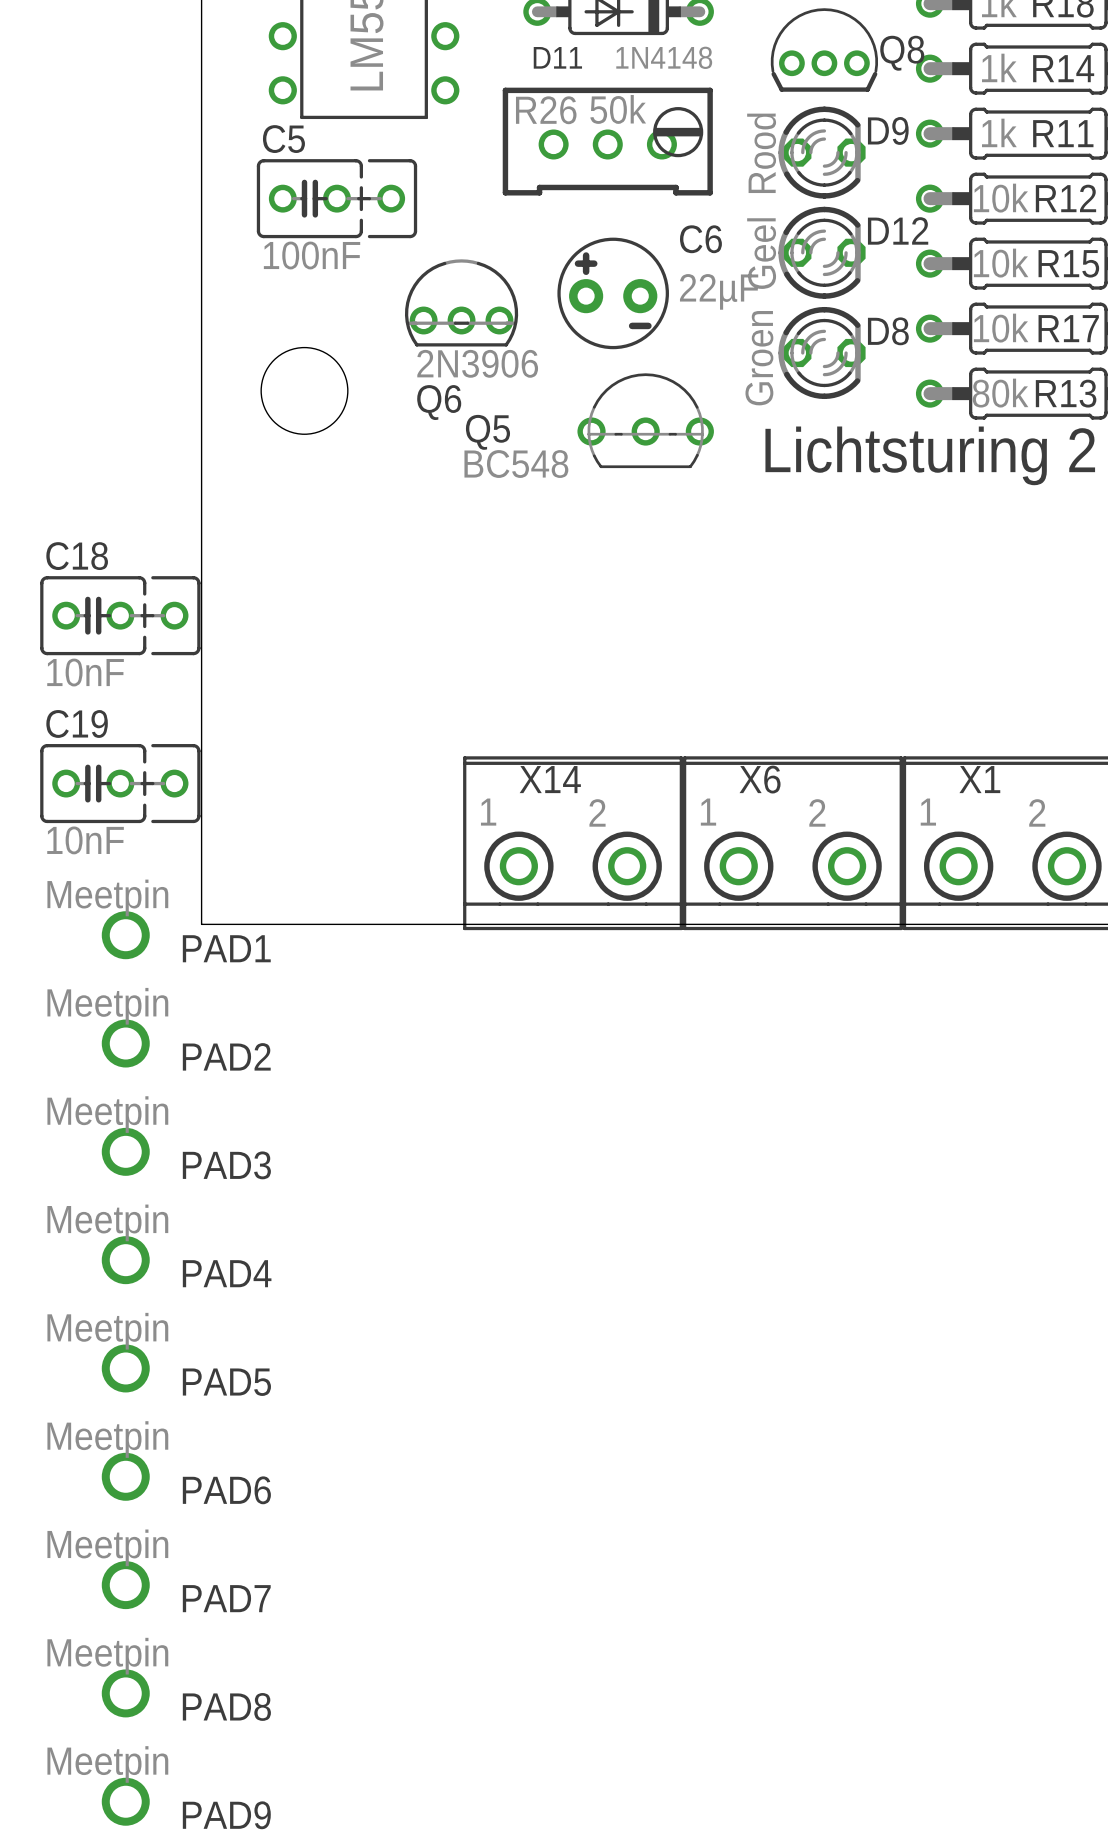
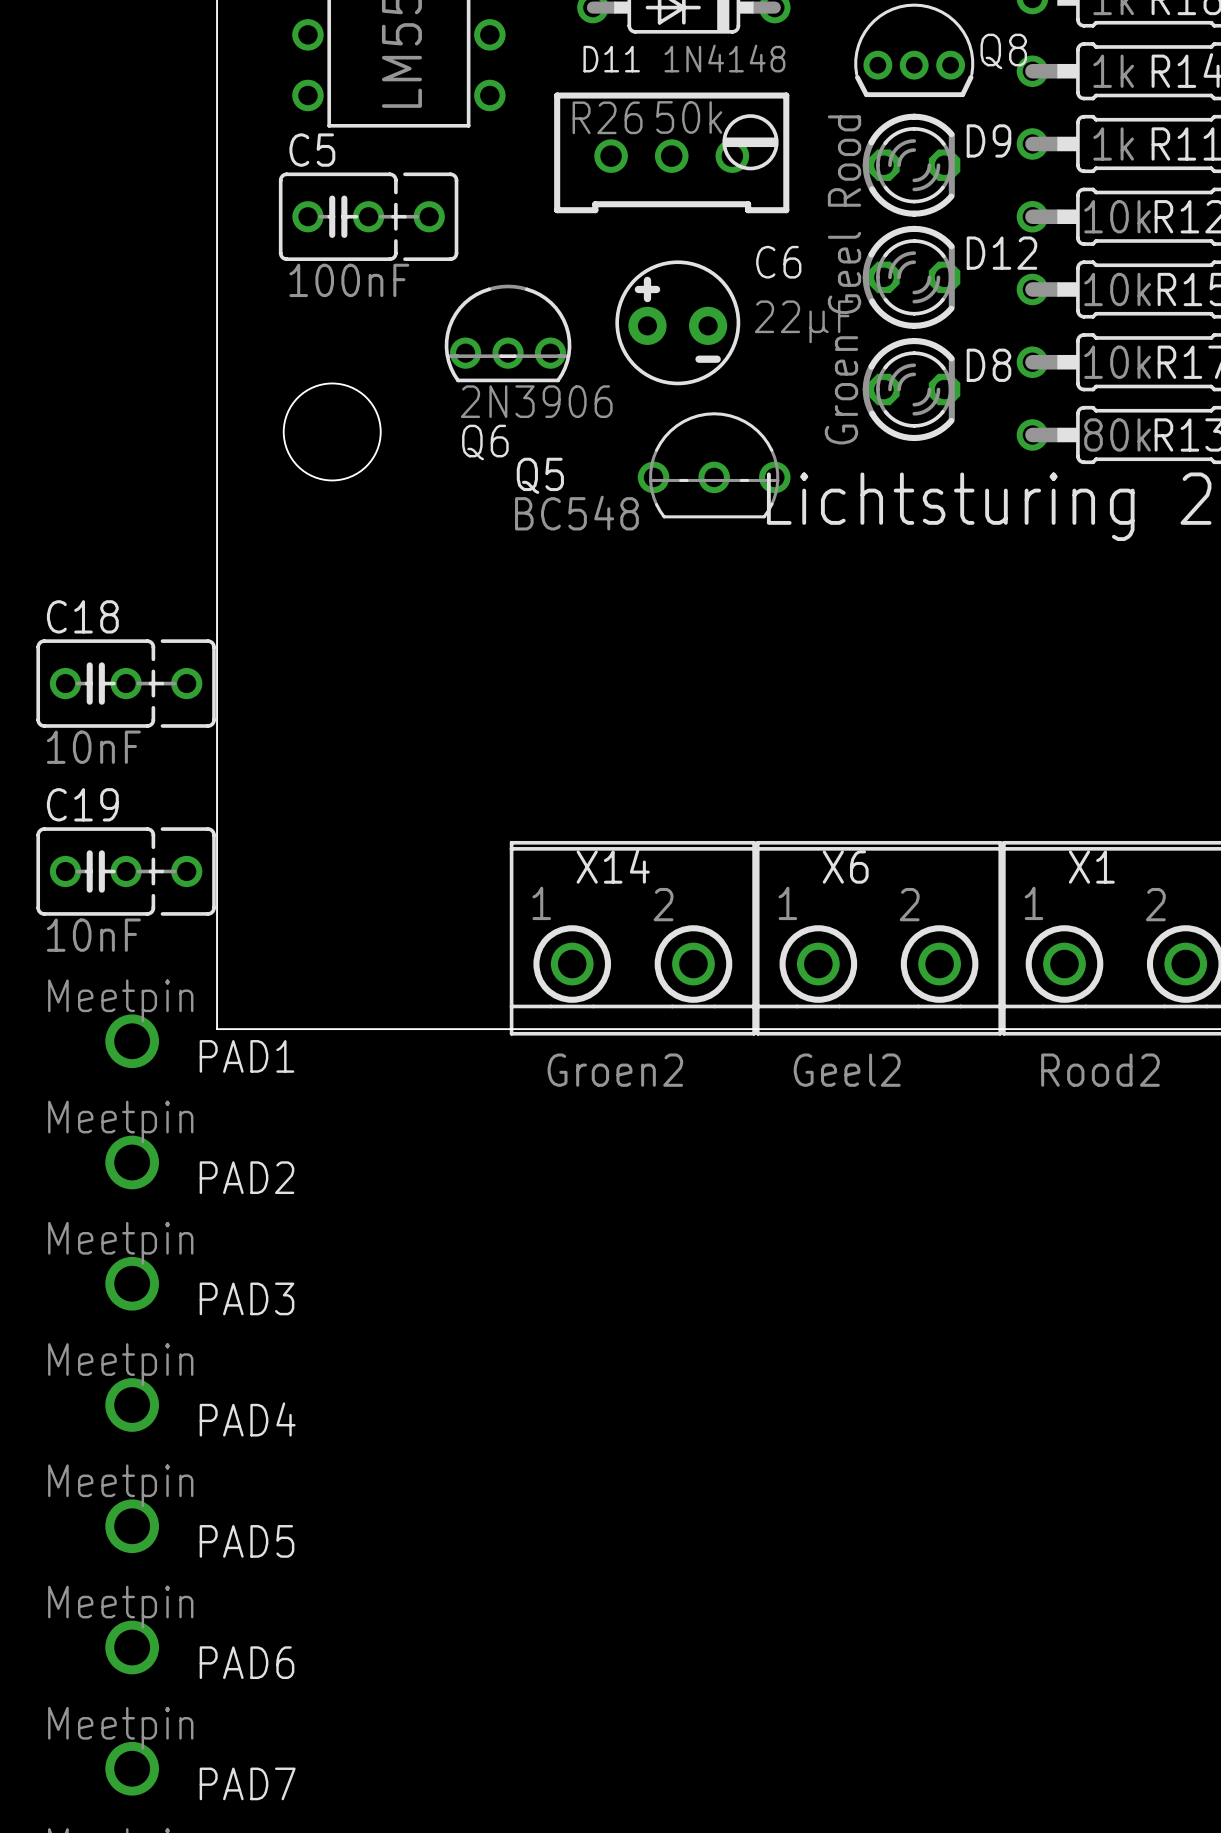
X14 value: none -> Groen2 (615, 1070)
X6 value: none -> Geel2 (847, 1070)
X1 value: none -> Rood2 (1100, 1070)

